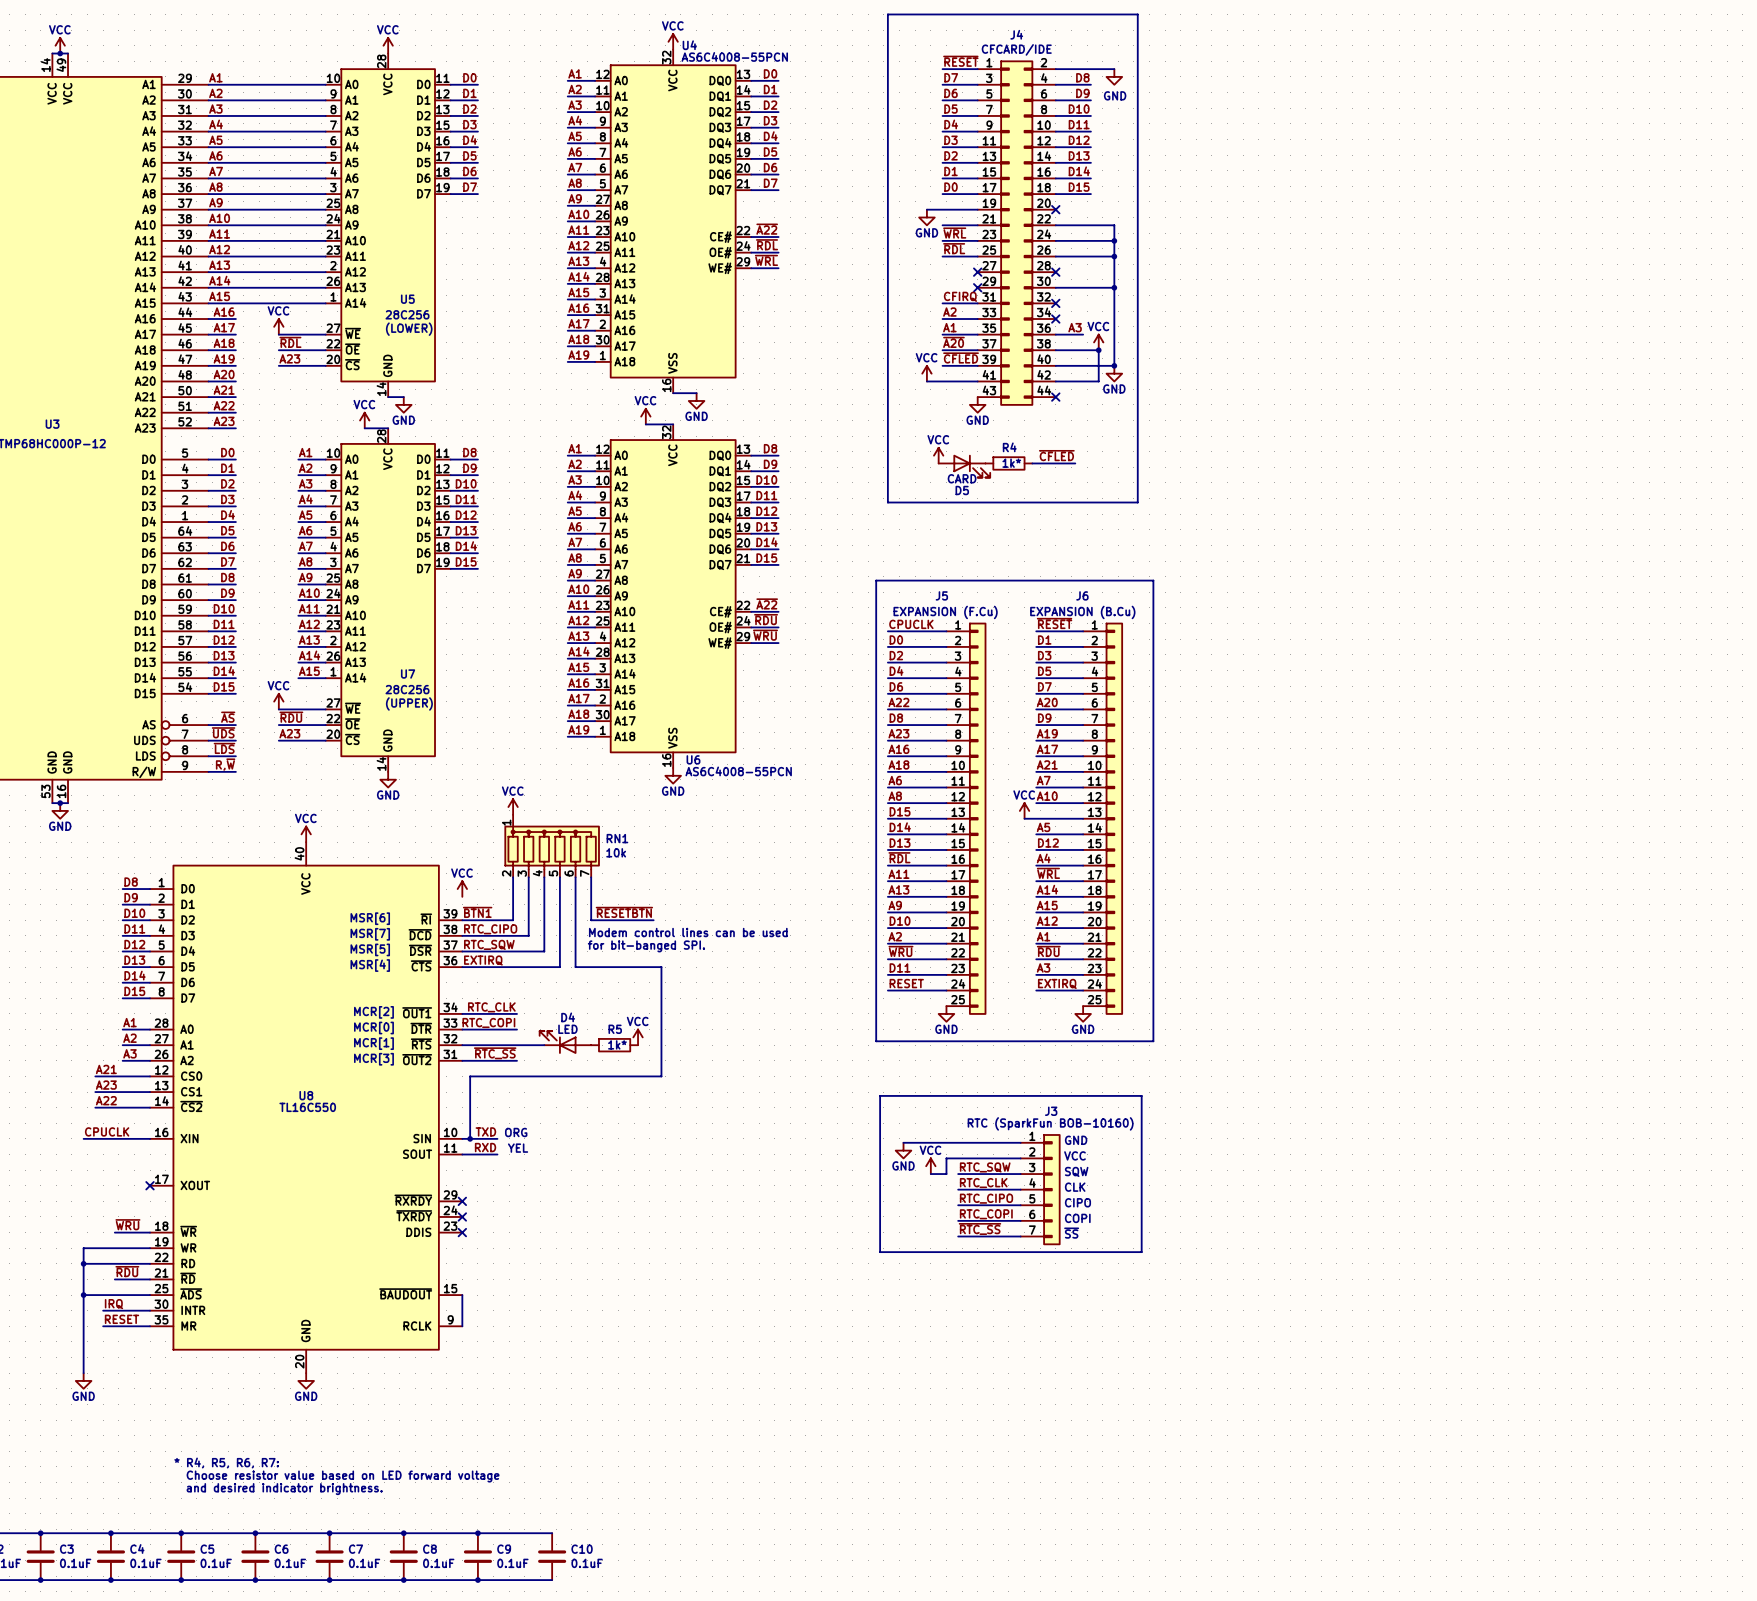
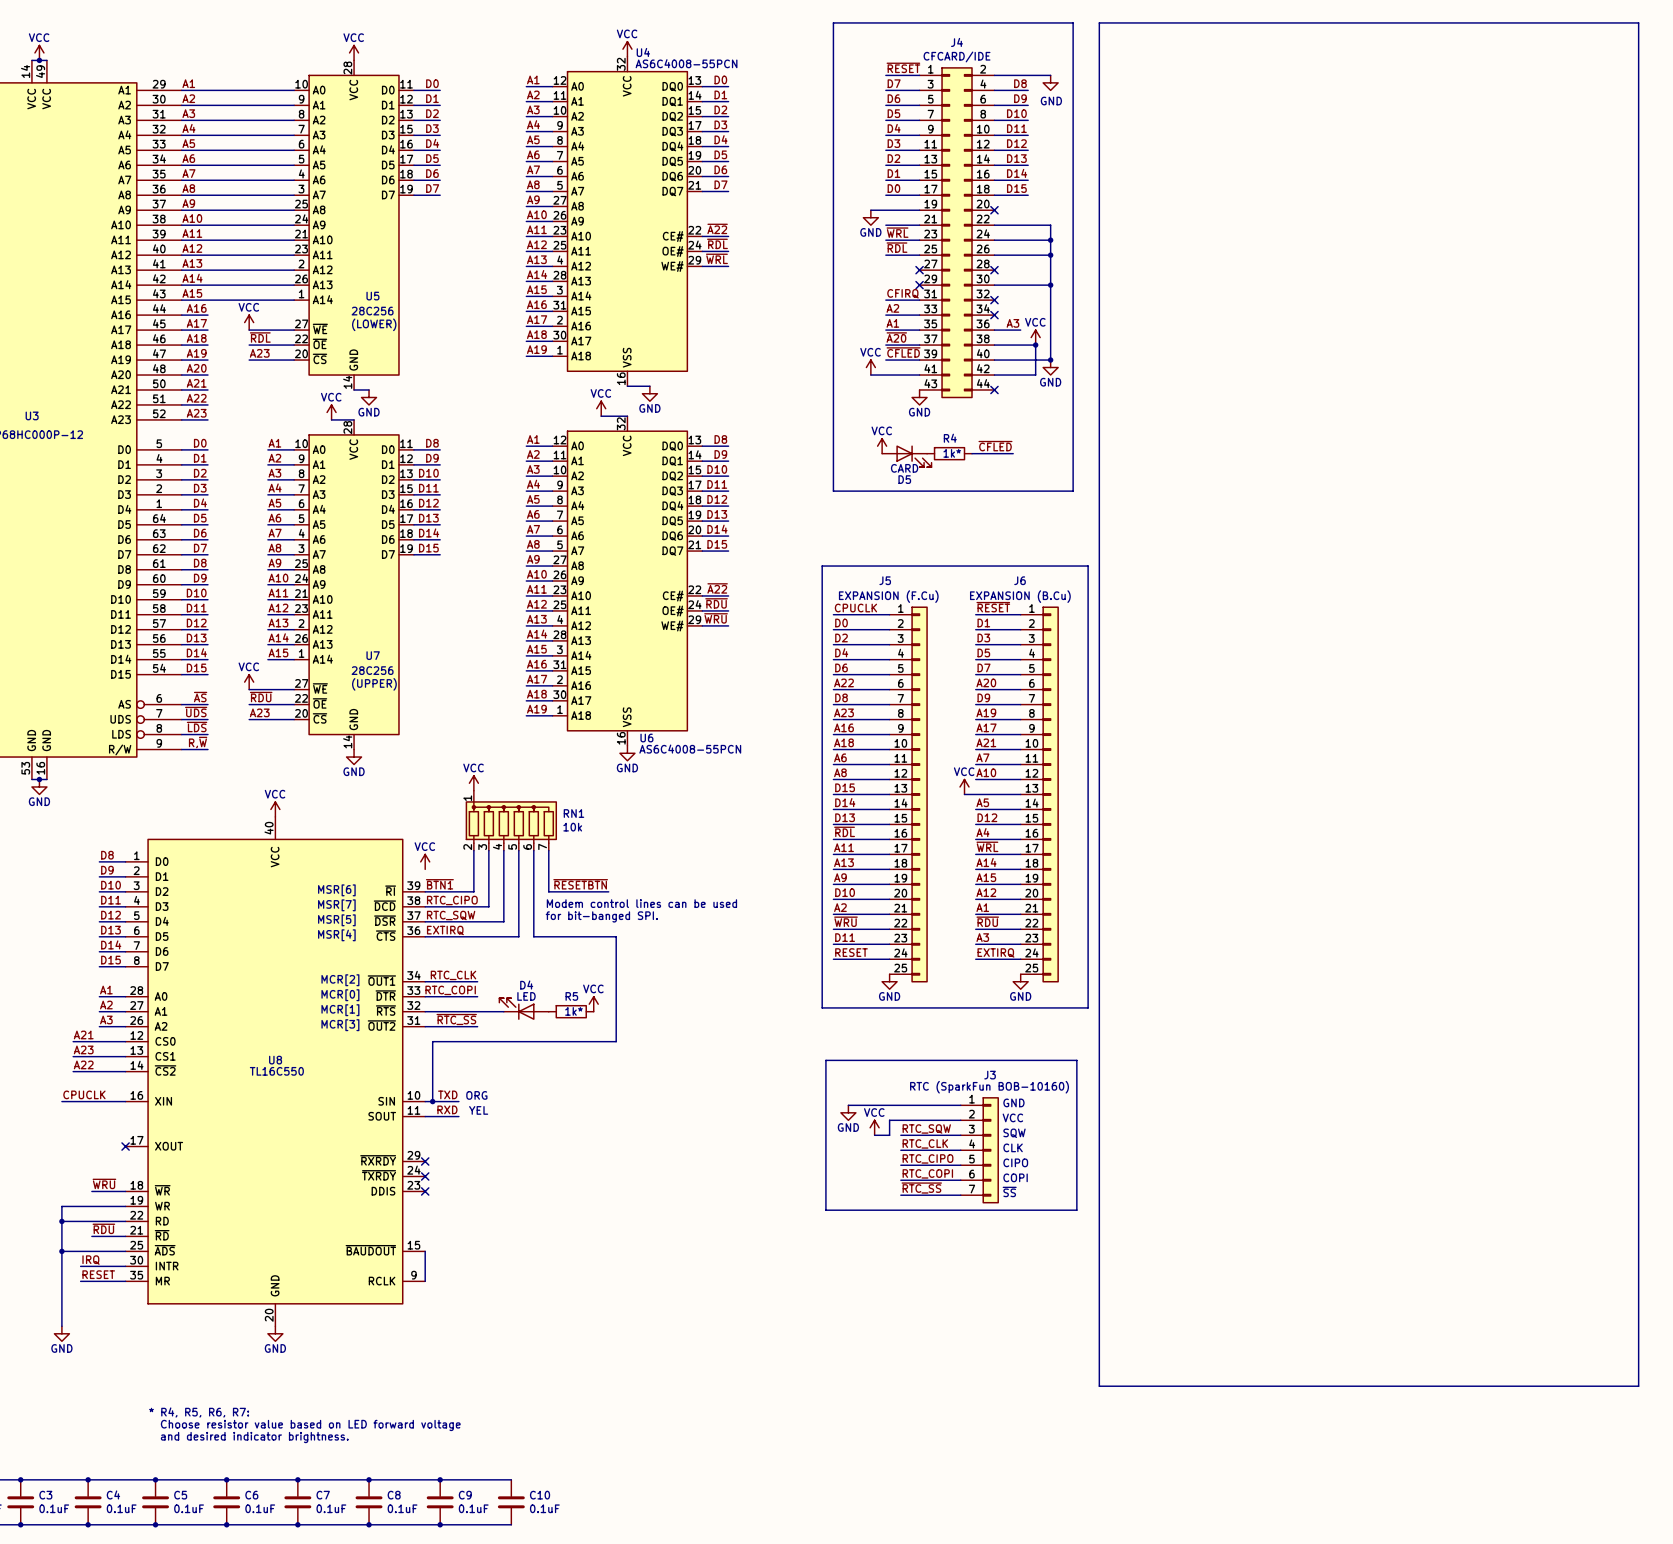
line: none -> (1099, 22) (1638, 22) (1638, 1386) (1099, 1386) (1099, 22)

